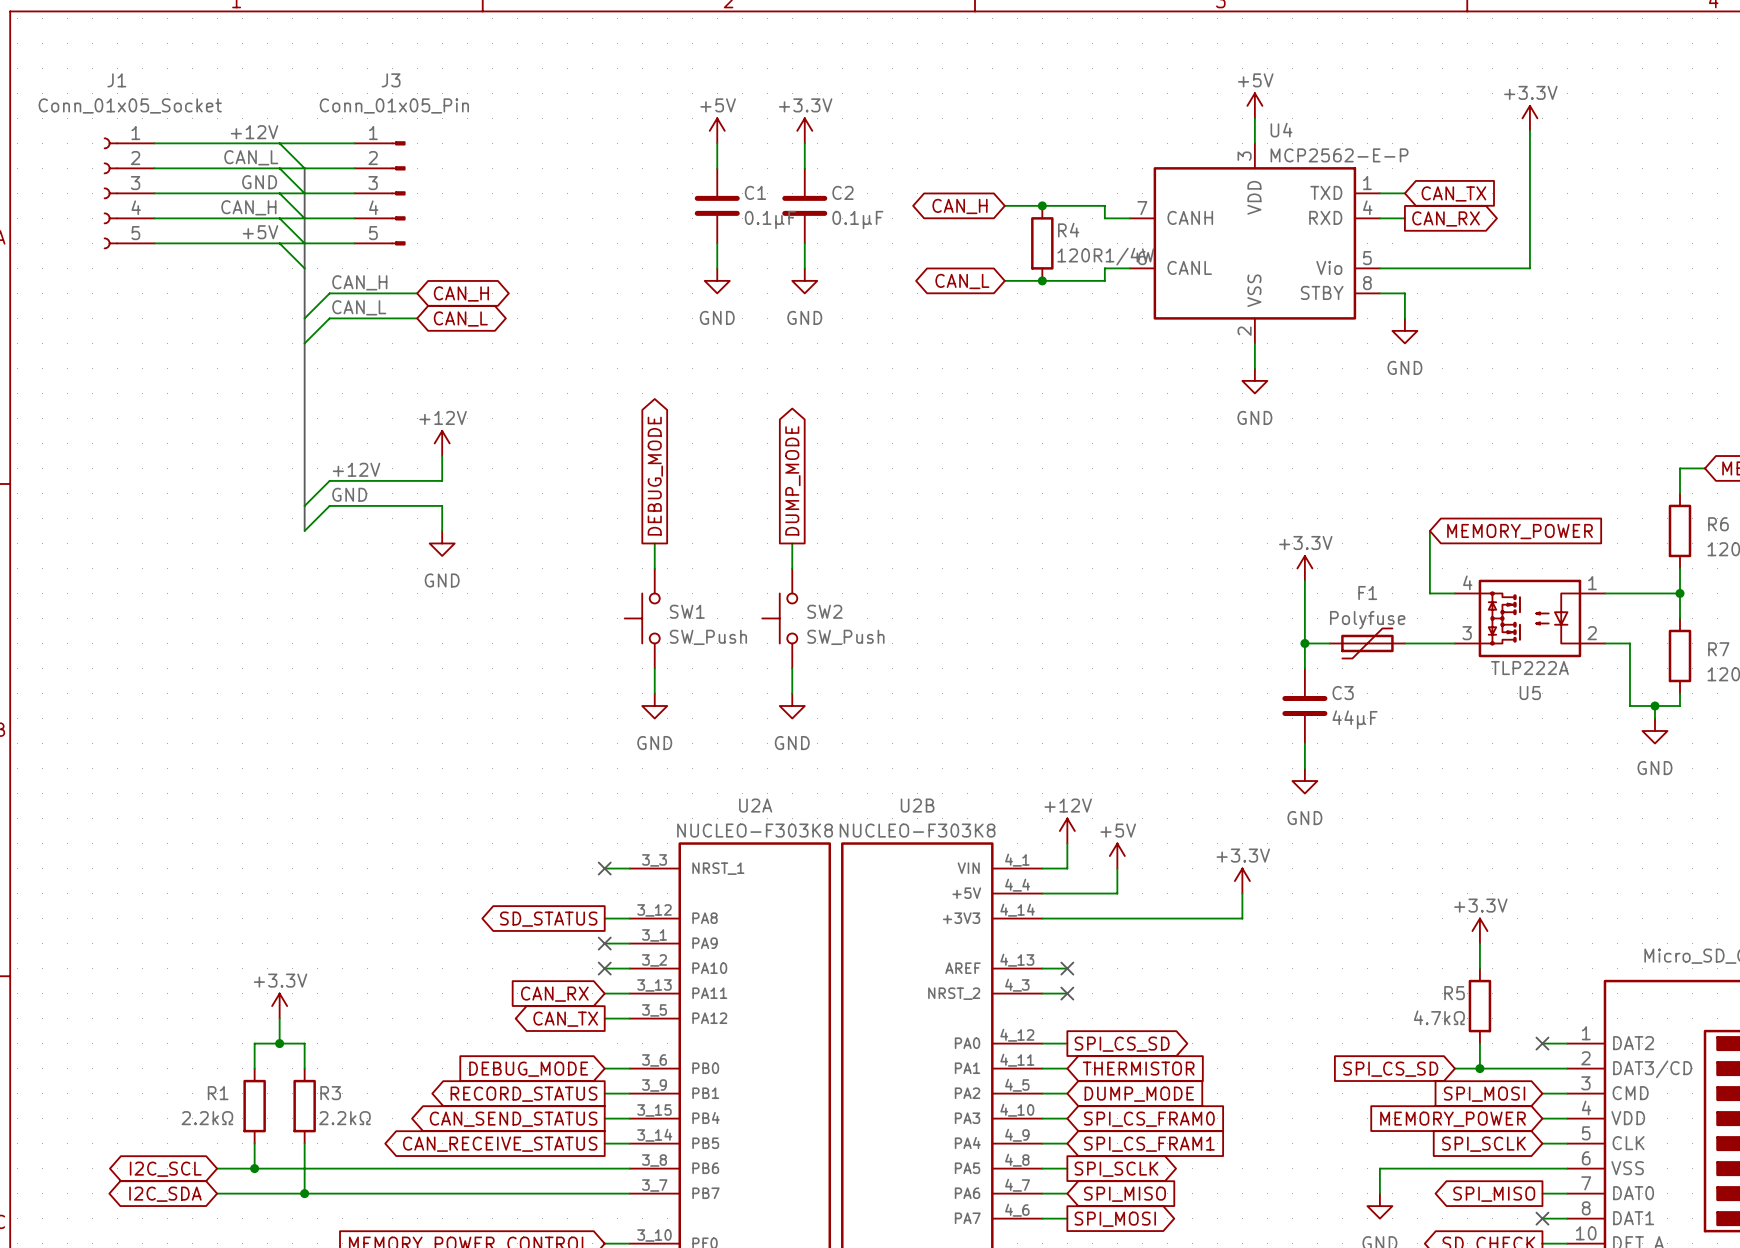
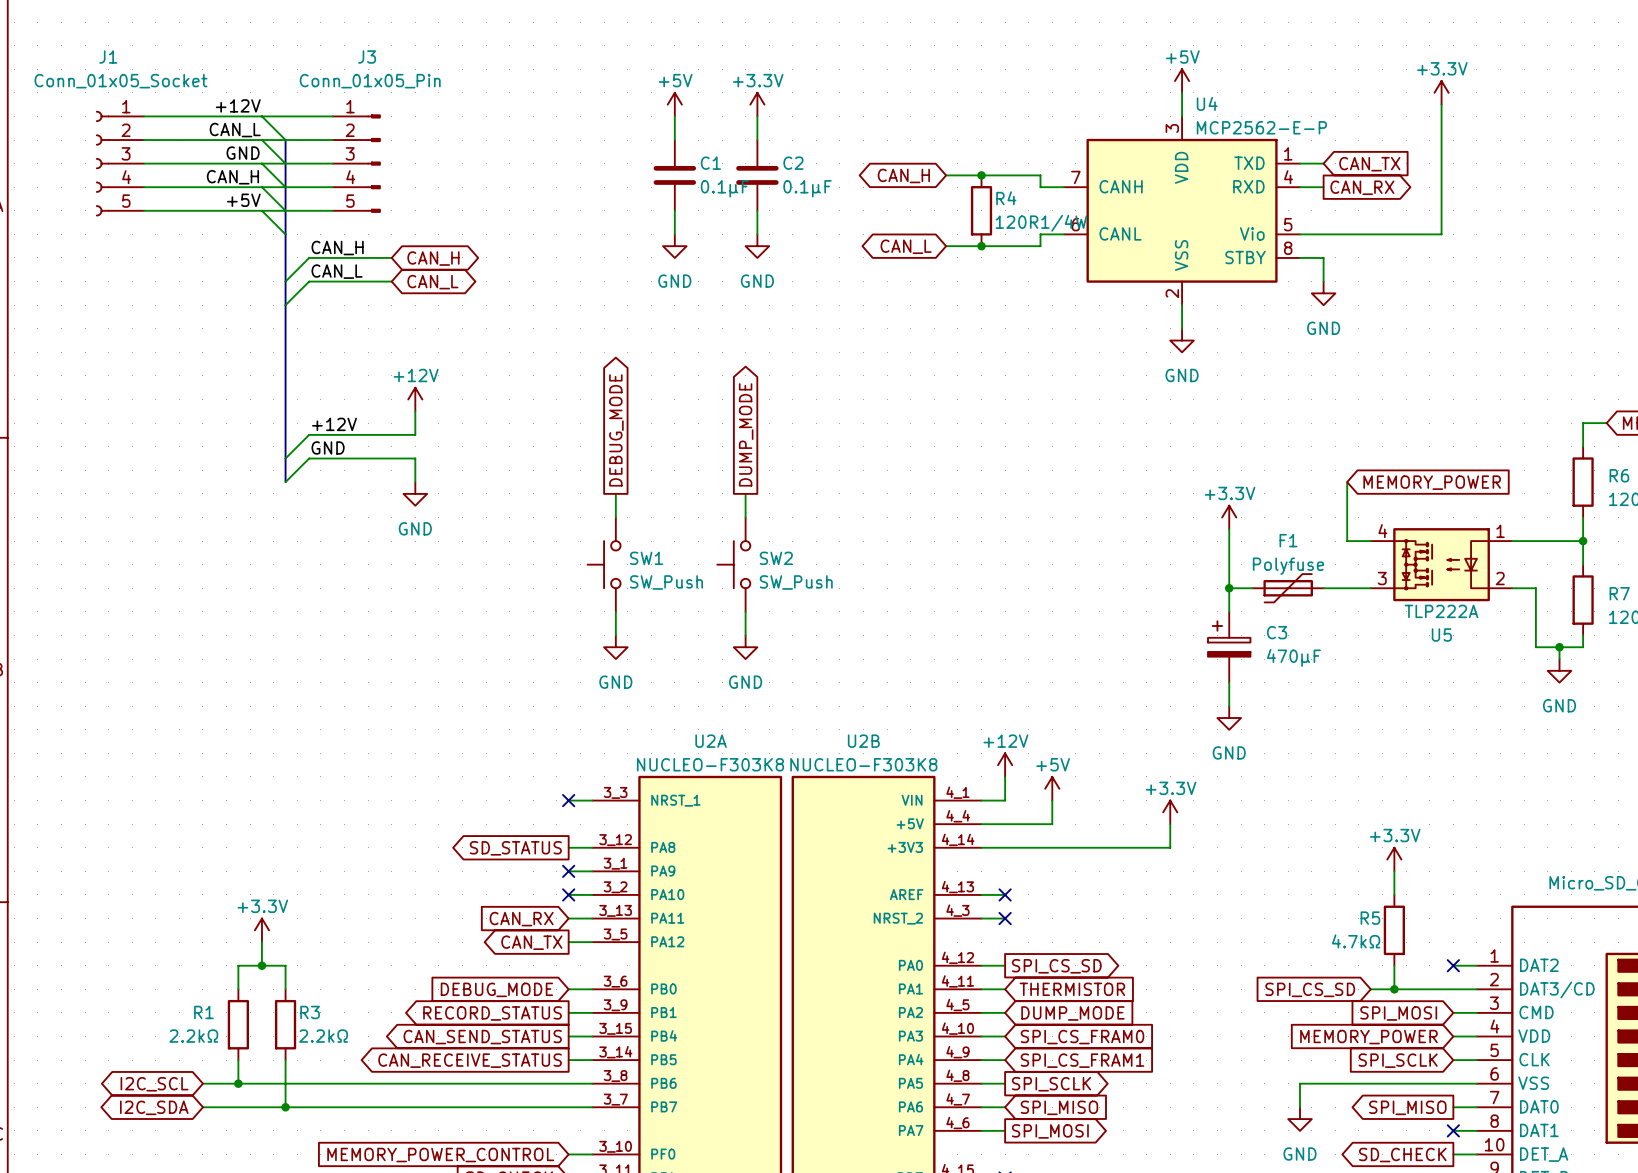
C3 symbol: [1282, 668, 1328, 744] -> [1208, 611, 1251, 683]
C3 value: 44μF (1355, 719) -> 470μF (1293, 657)

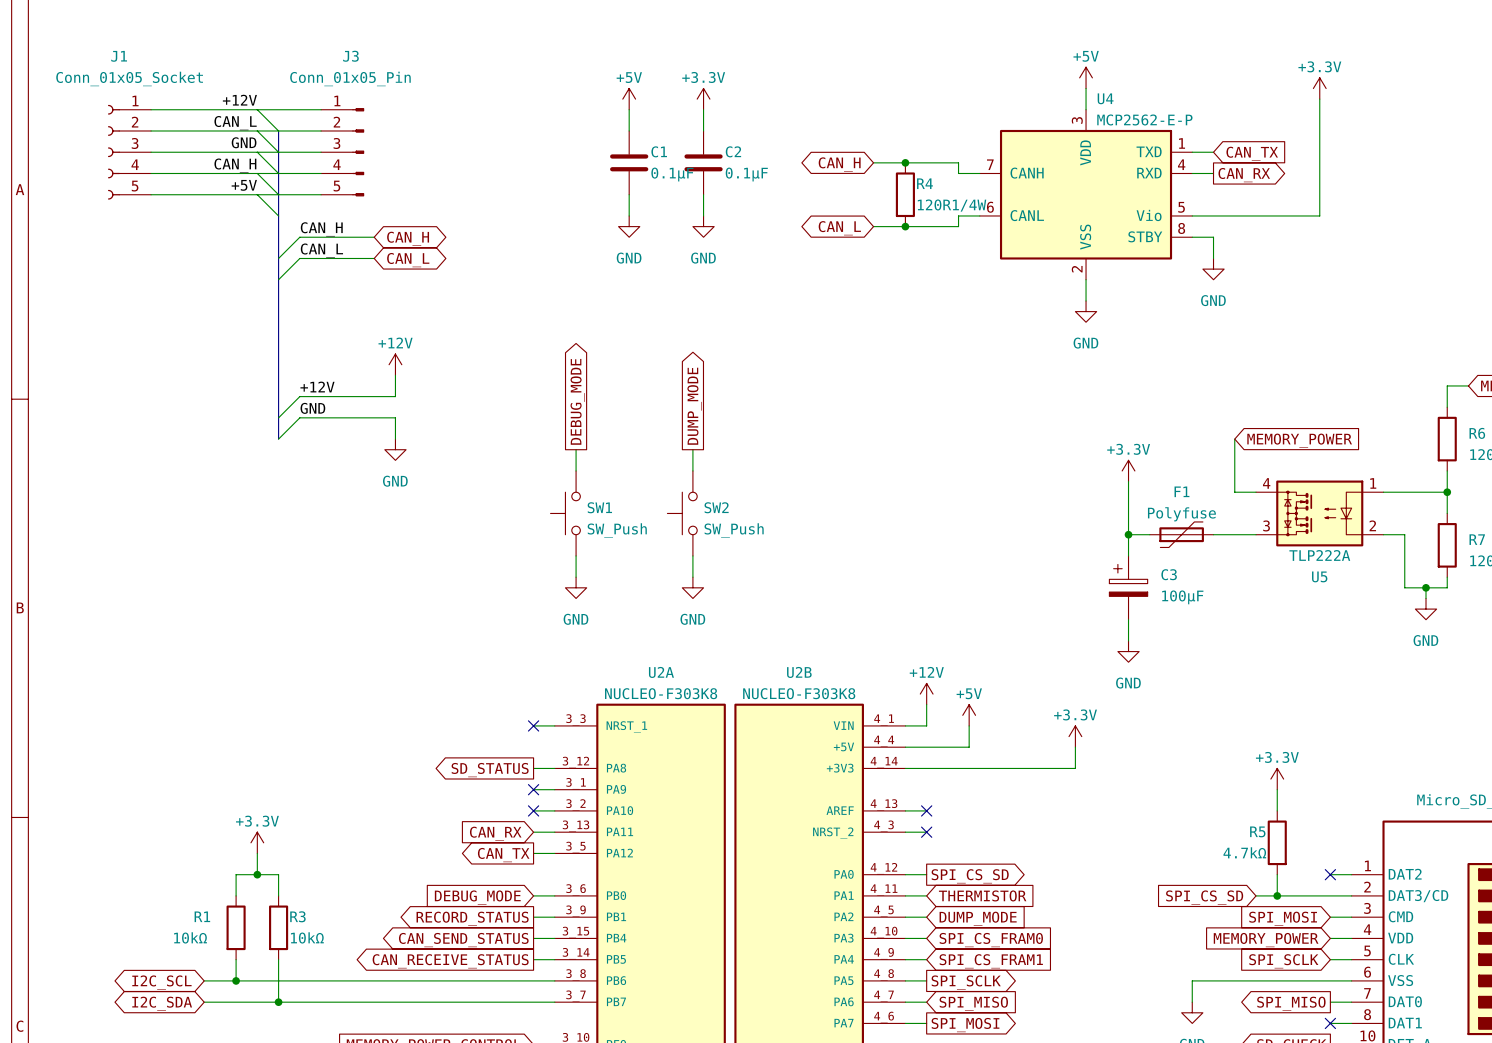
C3 value: 470μF (1293, 657) -> 100μF (1182, 597)
R1 value: 2.2kΩ (193, 1036) -> 10kΩ (190, 937)
R3 value: 2.2kΩ (323, 1036) -> 10kΩ (307, 937)

